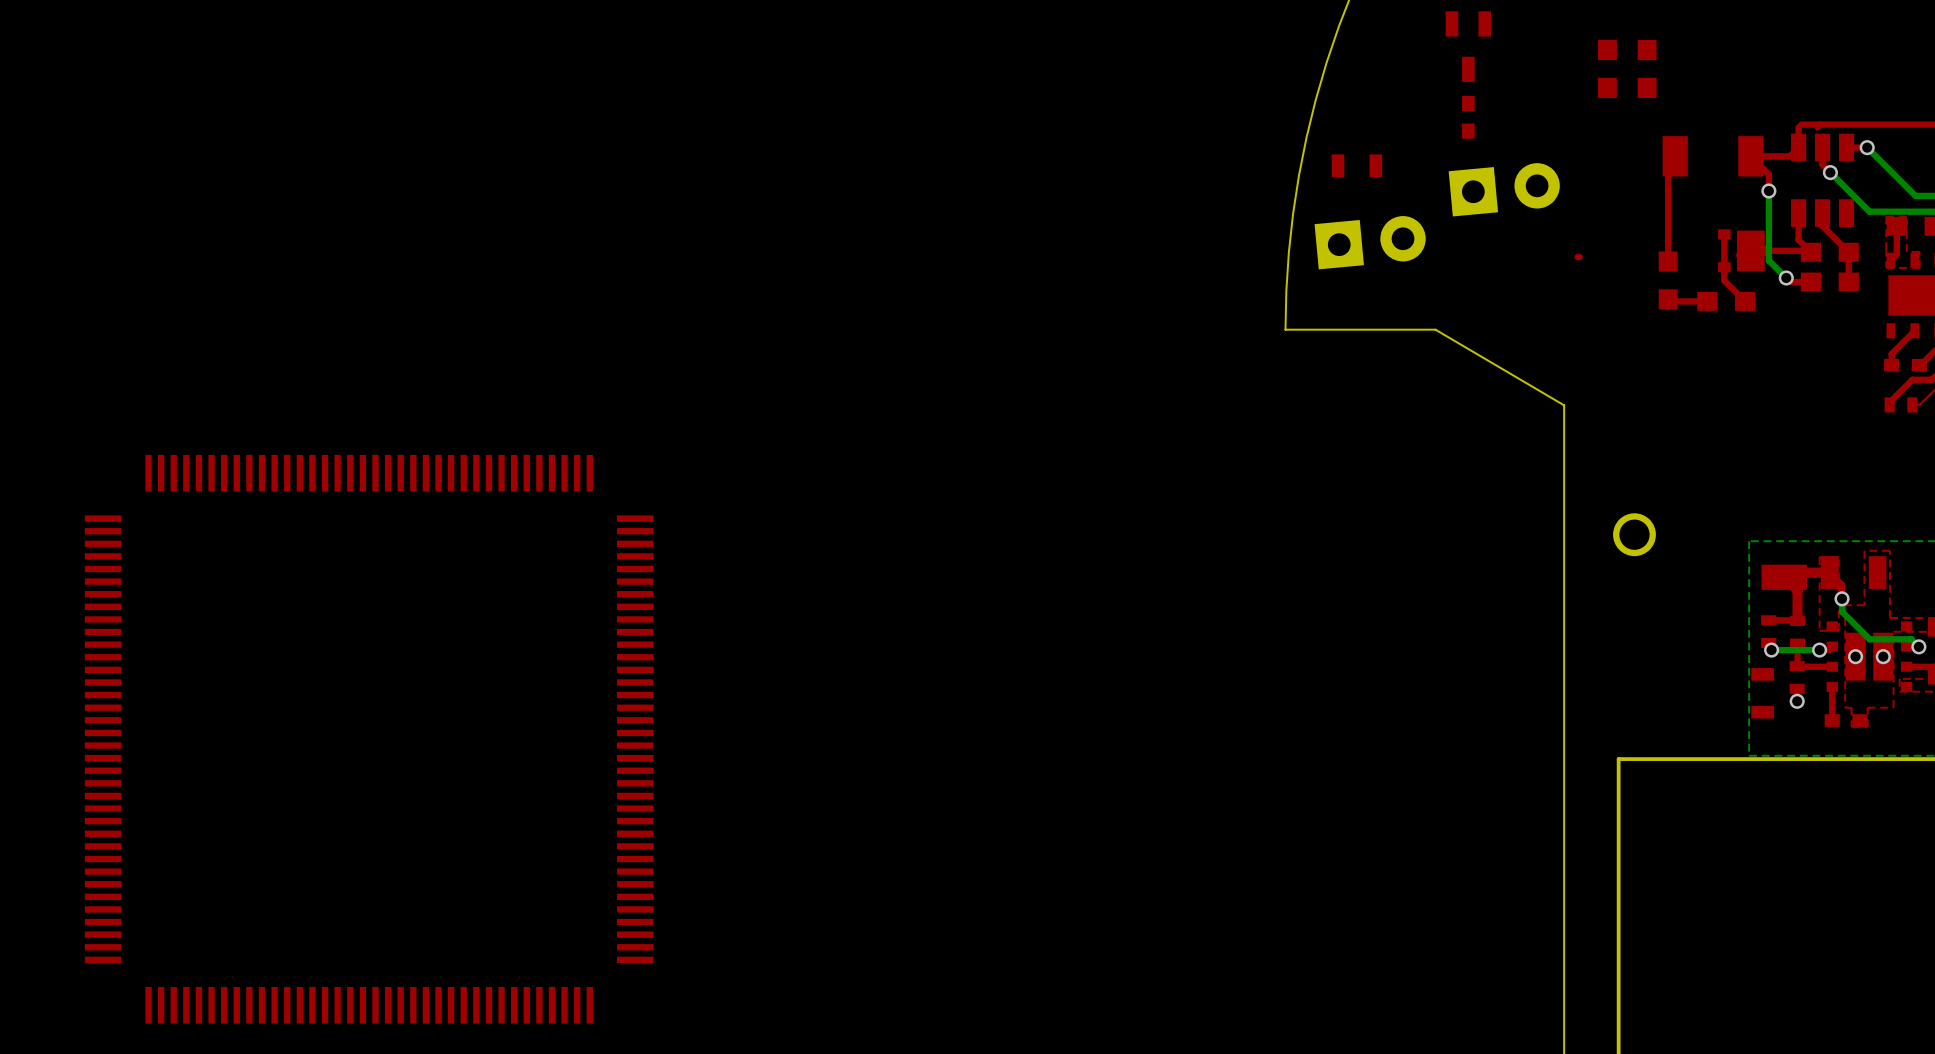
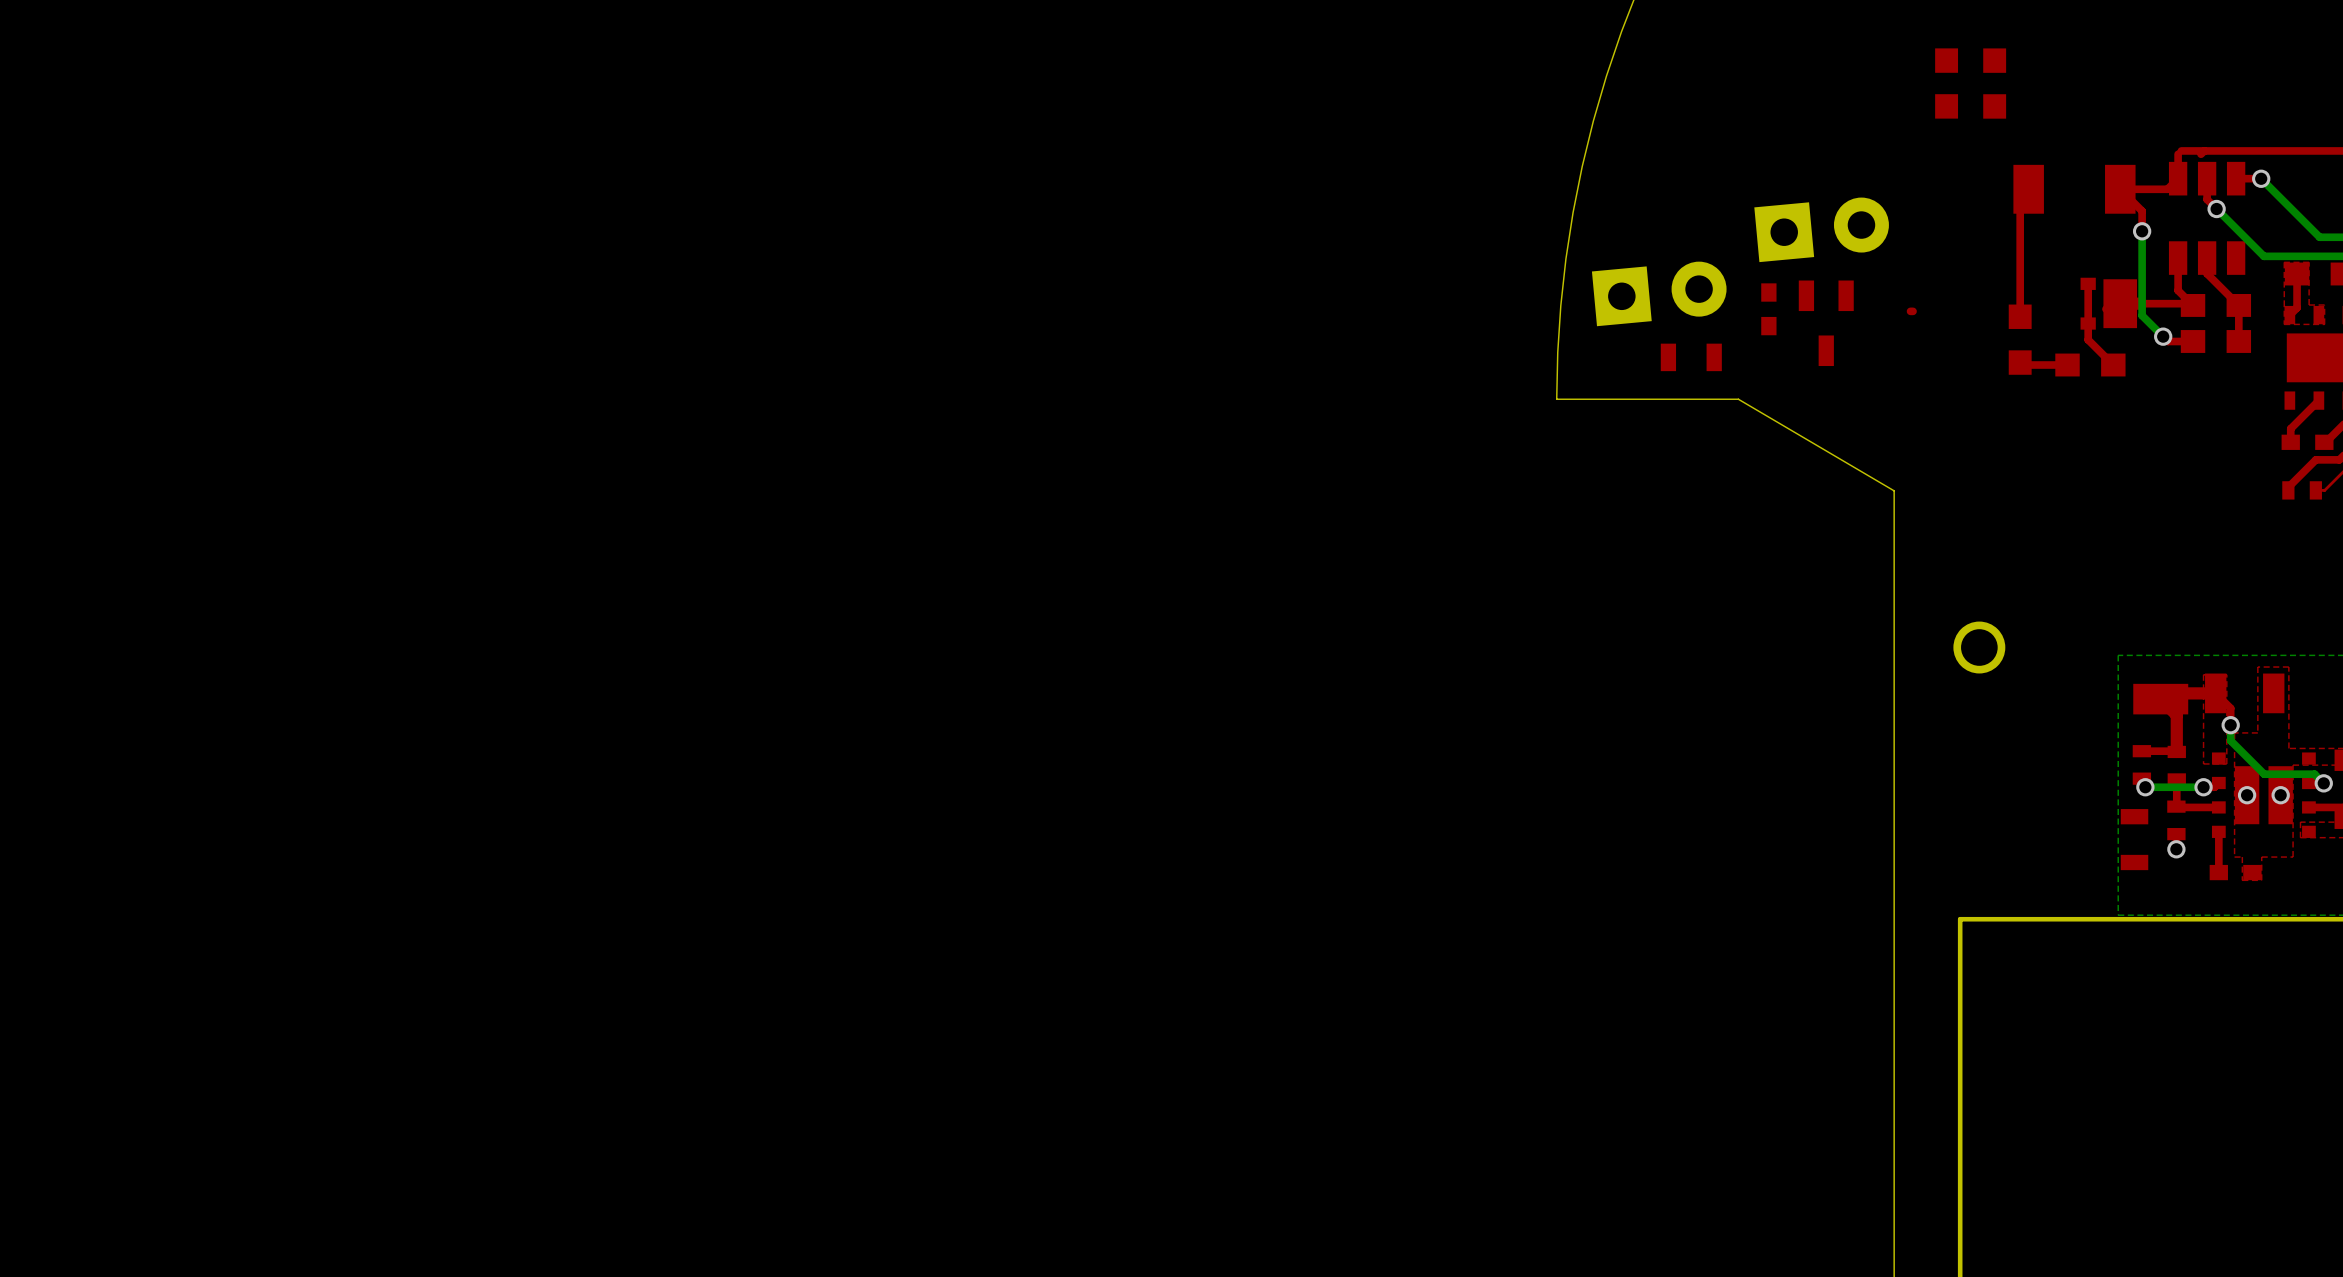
part position: (1468, 46) -> (1826, 323)
part position: (1468, 117) -> (1768, 309)
part position: (1356, 165) -> (1691, 357)
part: (369, 739) -> none

